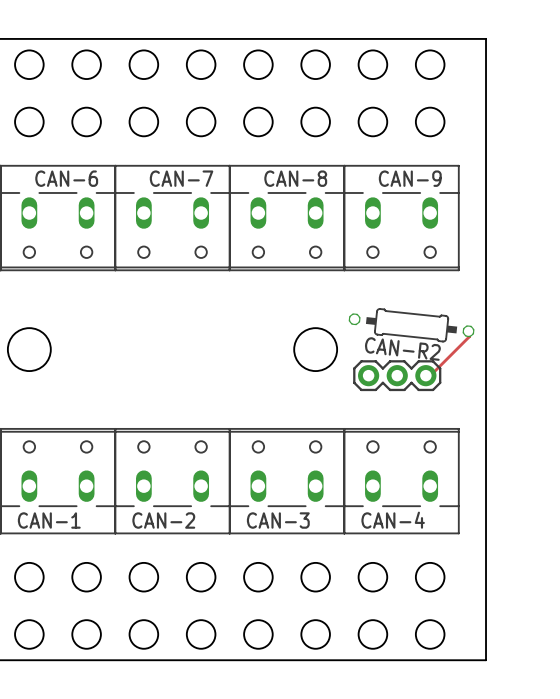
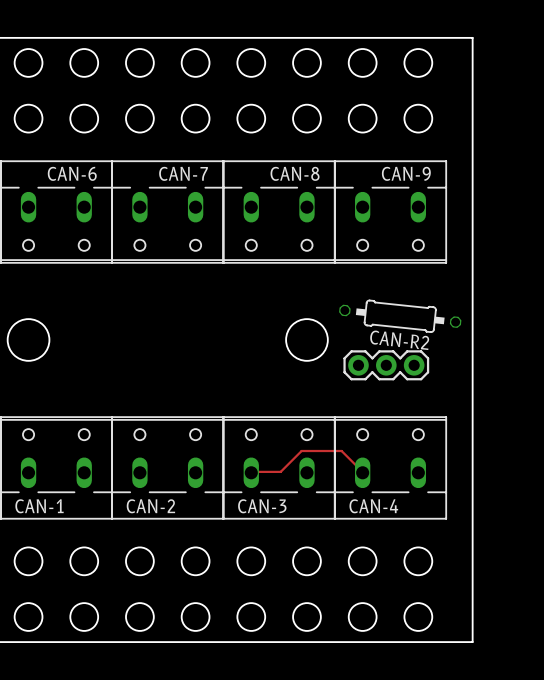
track: (468, 331) (469, 336) (426, 379) (425, 375) -> none
track: none -> (251, 472) (280, 471) (301, 451) (341, 451) (362, 472)

